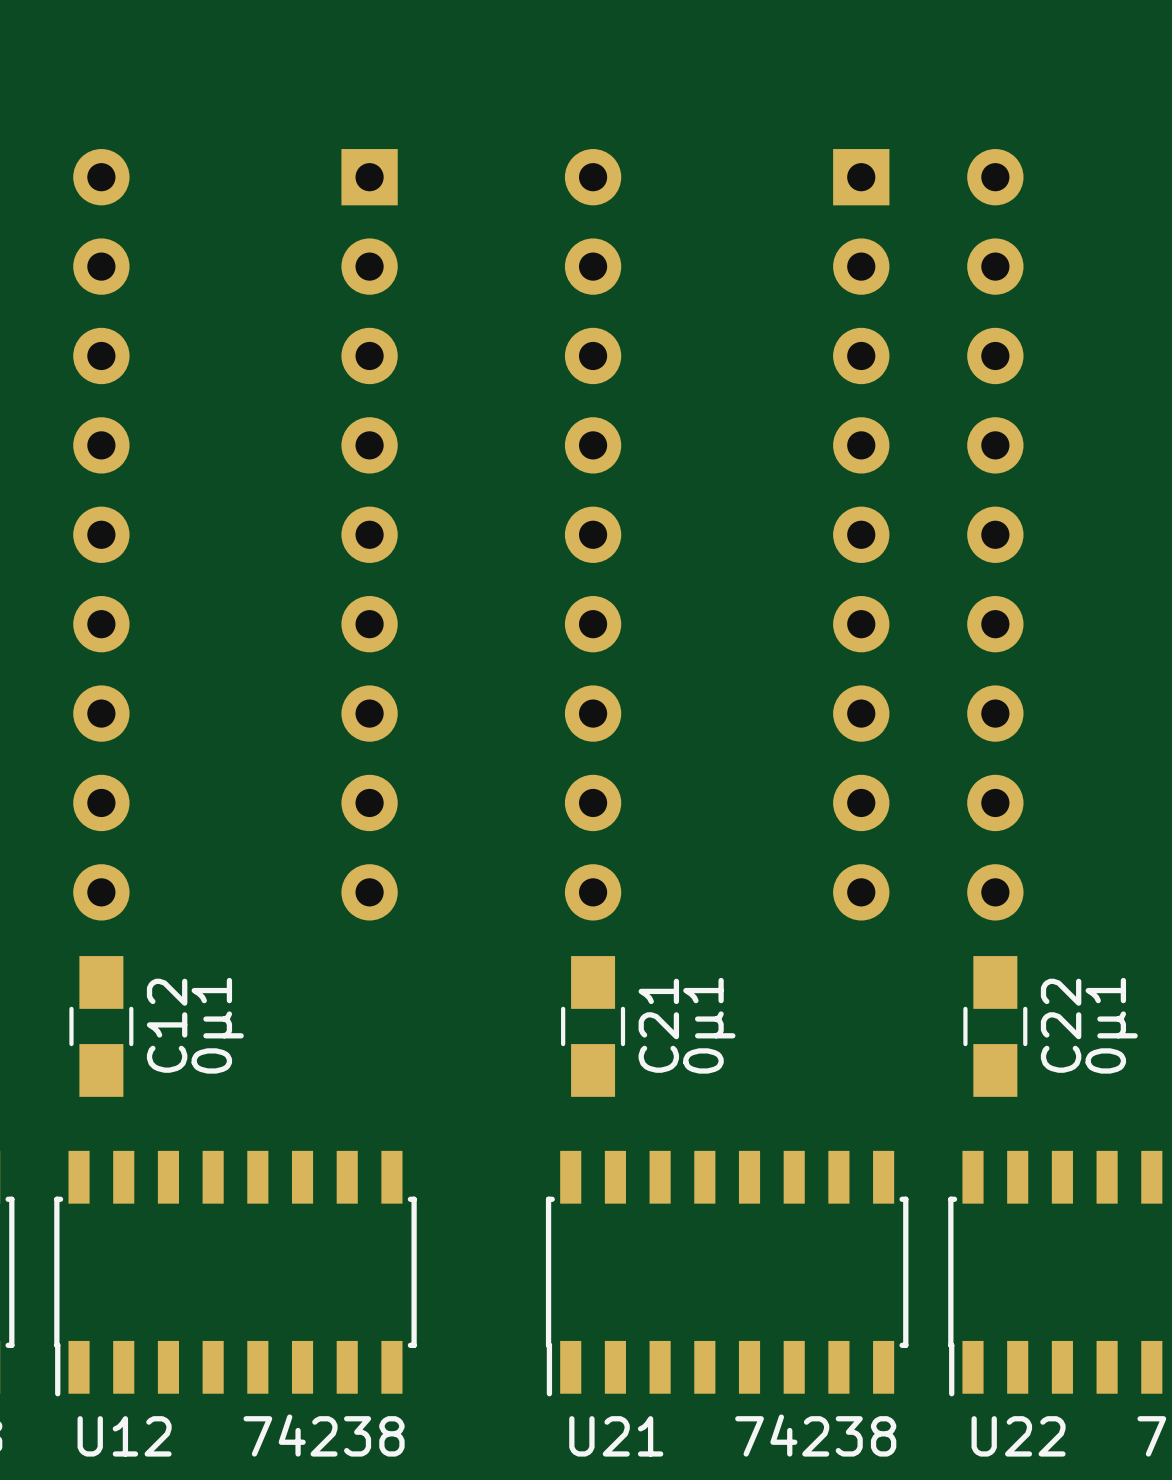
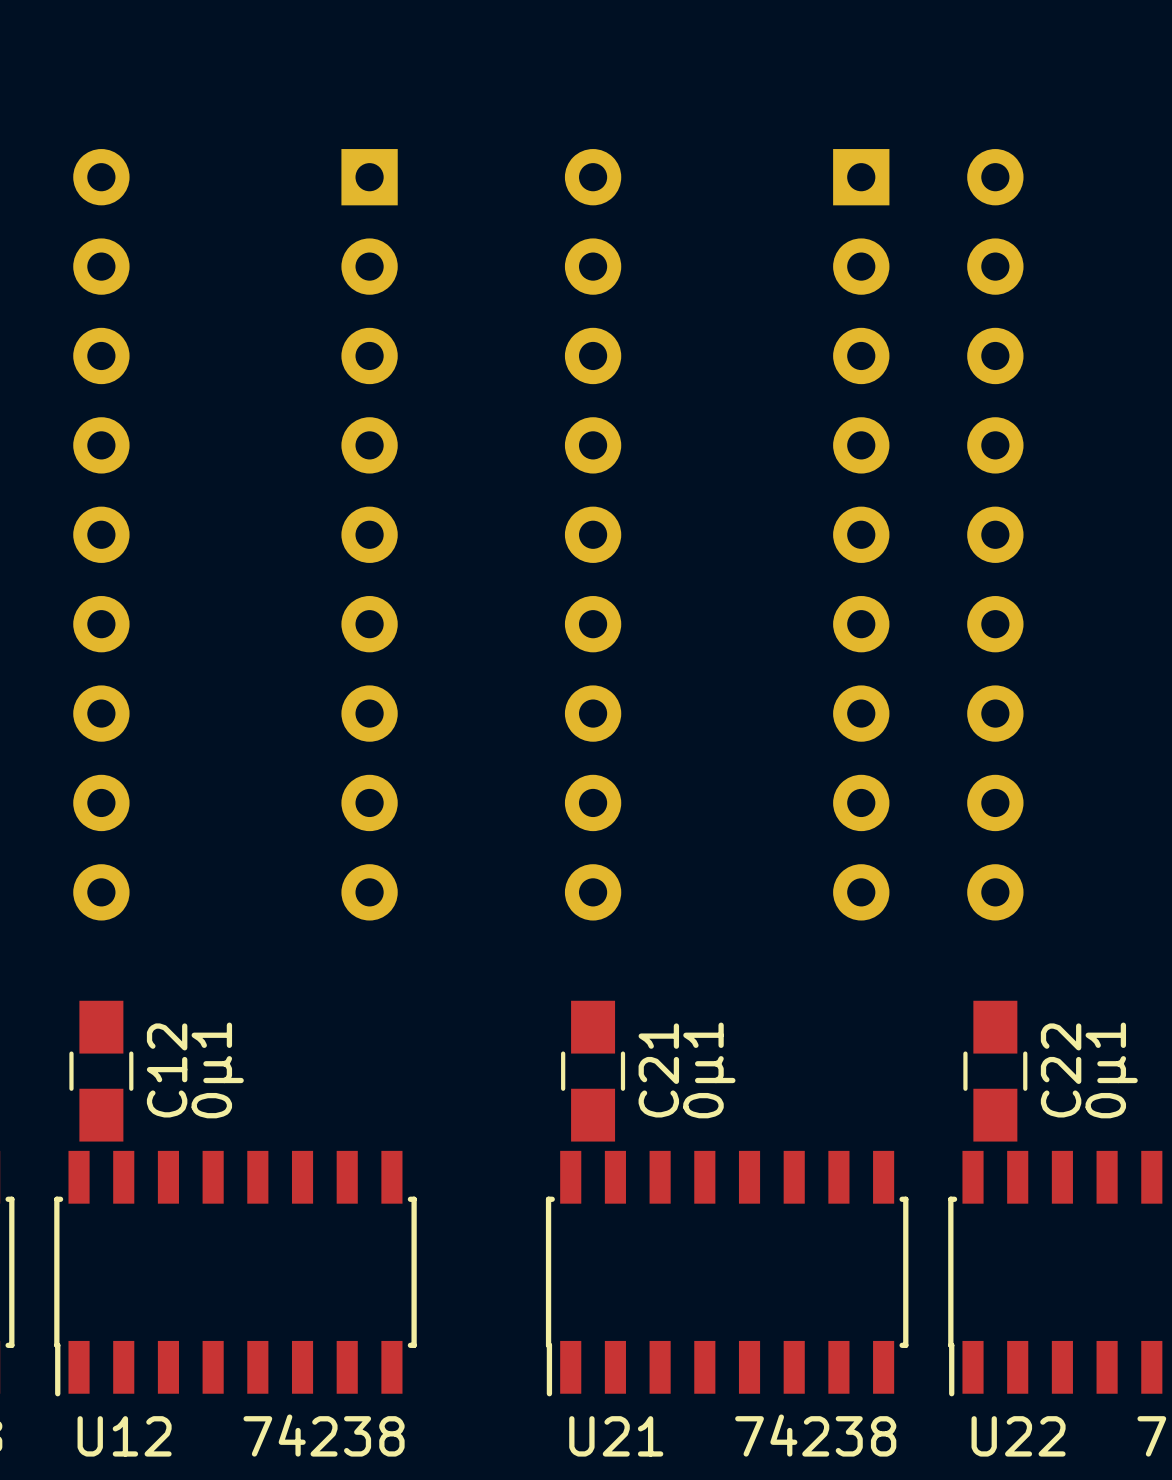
C12 position: (101, 1026) -> (101, 1071)
C21 position: (593, 1026) -> (593, 1071)
C22 position: (995, 1026) -> (995, 1071)

